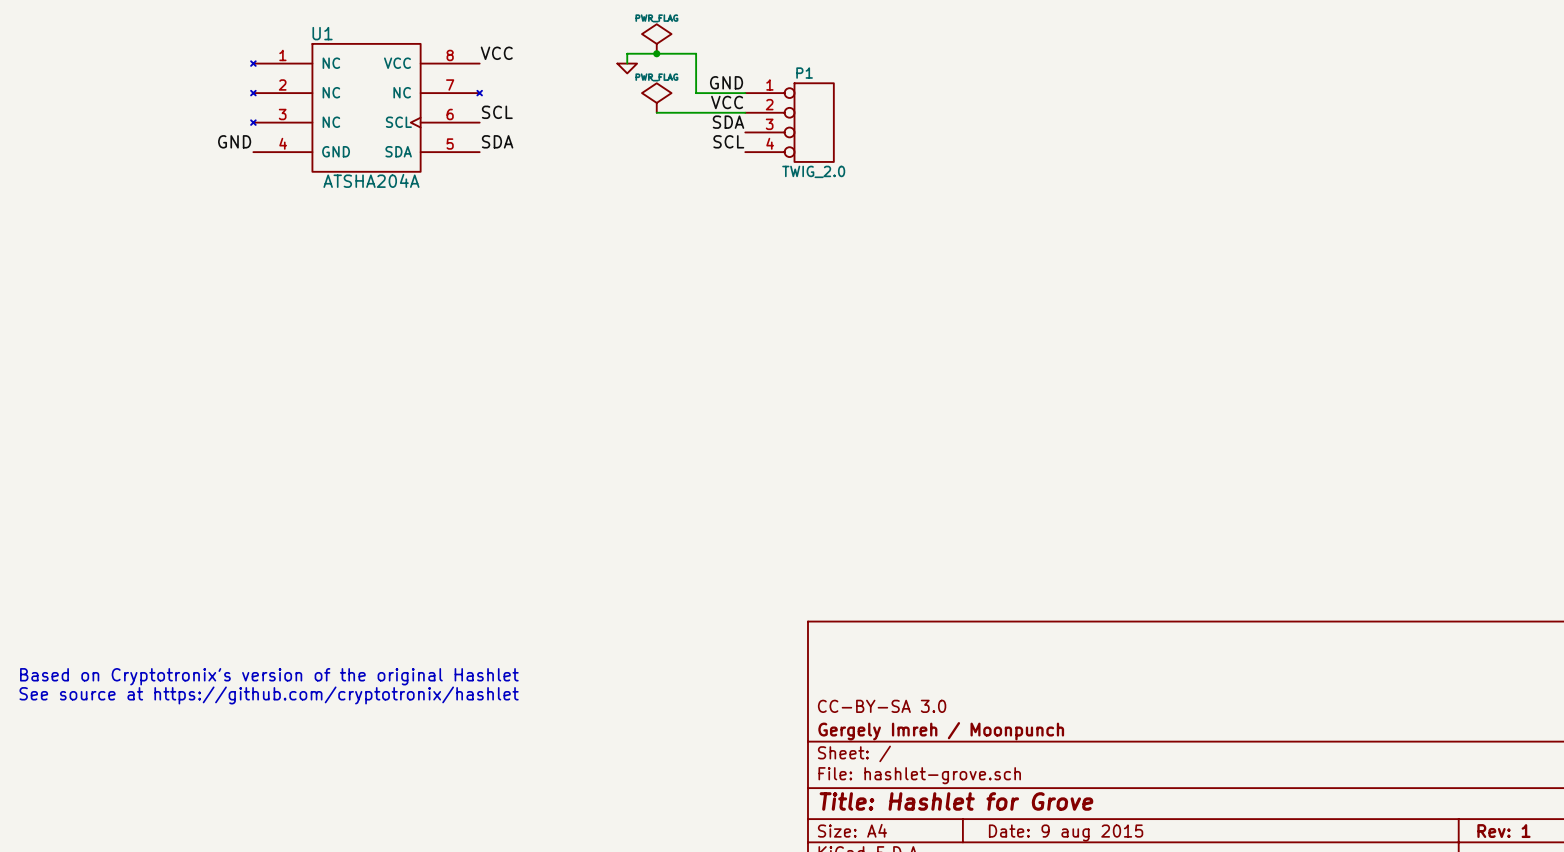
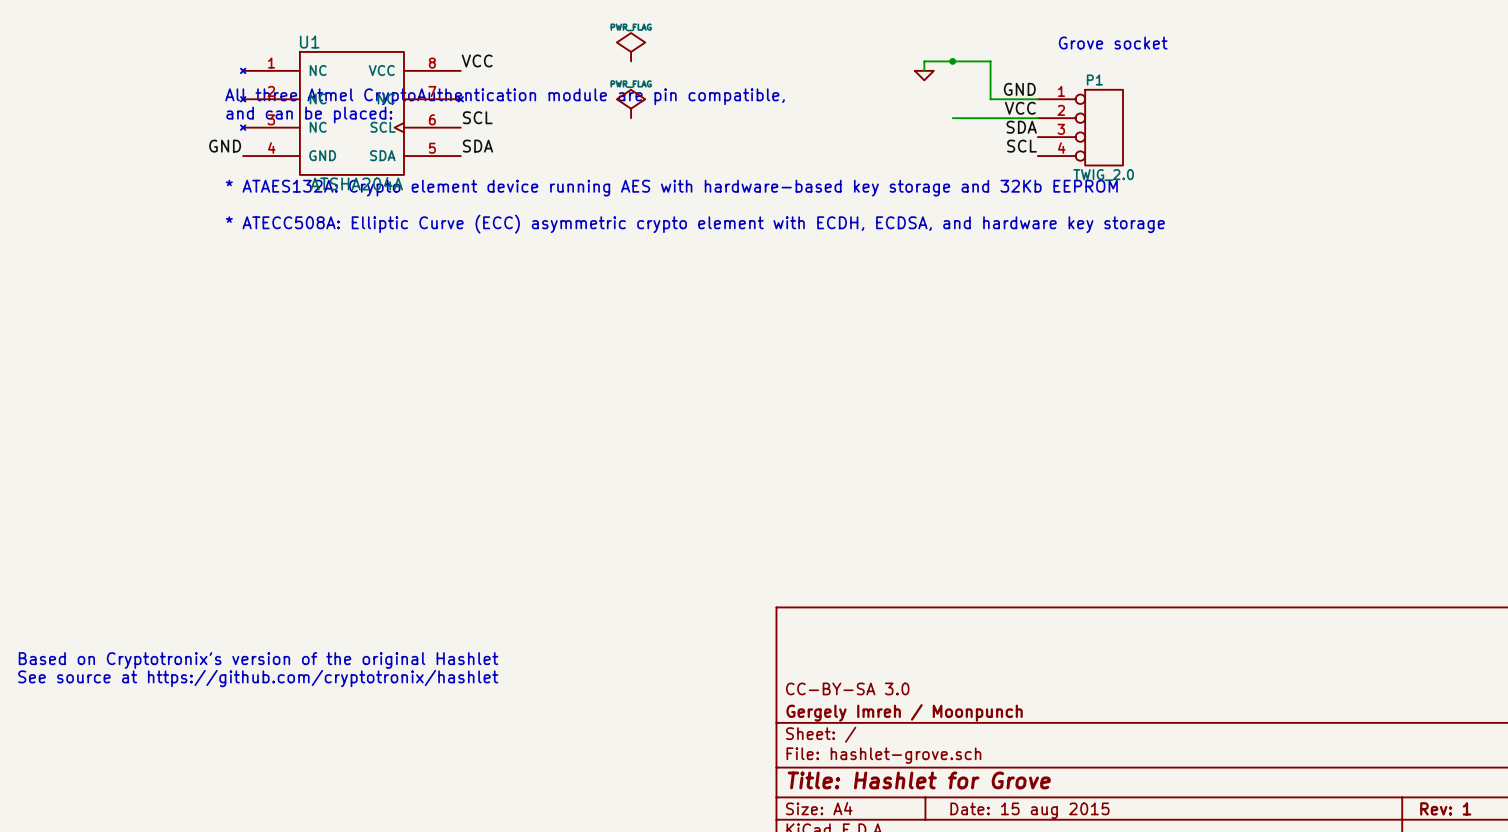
text: none -> Grove socket (1113, 43)
junction: (656, 53) -> none
junction: none -> (952, 61)
wire: (627, 63) (627, 53) (696, 53) (696, 93) (745, 93) -> none
wire: none -> (924, 70) (924, 61) (990, 61) (990, 99) (1037, 99)
power symbol: (627, 68) -> none
power symbol: none -> (924, 75)
label: GND (726, 82) -> none
label: none -> GND (1019, 89)
text: none -> All three Atmel CryptoAuthentication module are pin compatible, (505, 96)
label: VCC (727, 102) -> none
label: none -> VCC (1020, 108)
text: none -> and can be placed: (309, 115)
wire: (656, 112) (745, 112) -> none
wire: none -> (952, 118) (1037, 118)
label: SDA (728, 122) -> none
P1 position: (789, 122) -> (1080, 127)
label: none -> SDA (1021, 127)
label: SCL (728, 141) -> none
label: none -> SCL (1021, 146)
text: none -> * ATAES132A: Crypto element device running AES with hardware-based key storage and 32Kb EEPROM (671, 188)
text: none -> * ATECC508A: Elliptic Curve (ECC) asymmetric crypto element with ECDH, ECDSA, and hardware key storage (695, 224)
title block: Date: 9 aug 2015 (1066, 832) -> Date: 15 aug 2015 (1029, 810)

